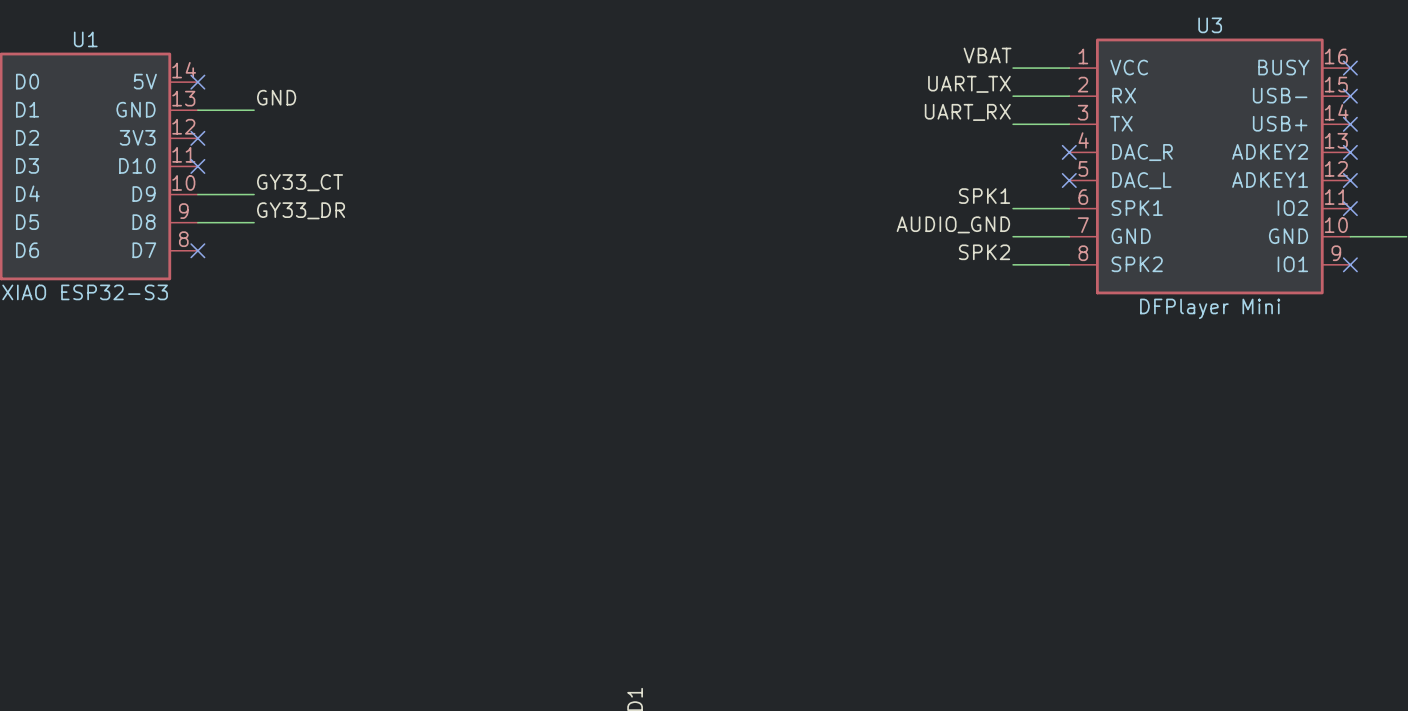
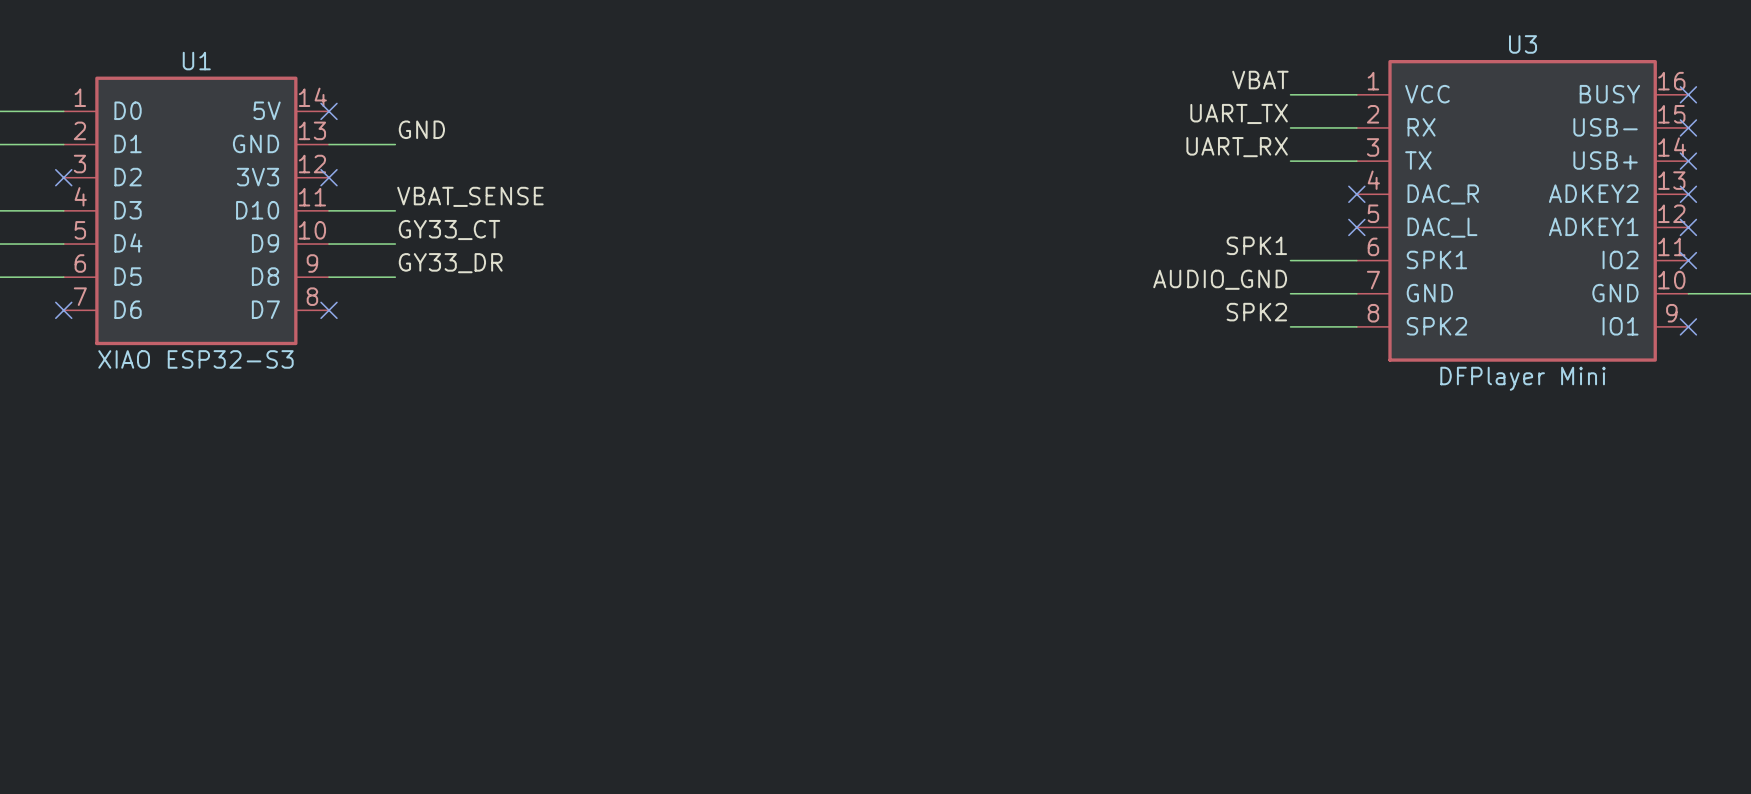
label: none -> VBAT_SENSE (470, 196)
wire: none -> (329, 210) (395, 210)
no-connect mark: (197, 166) -> none

